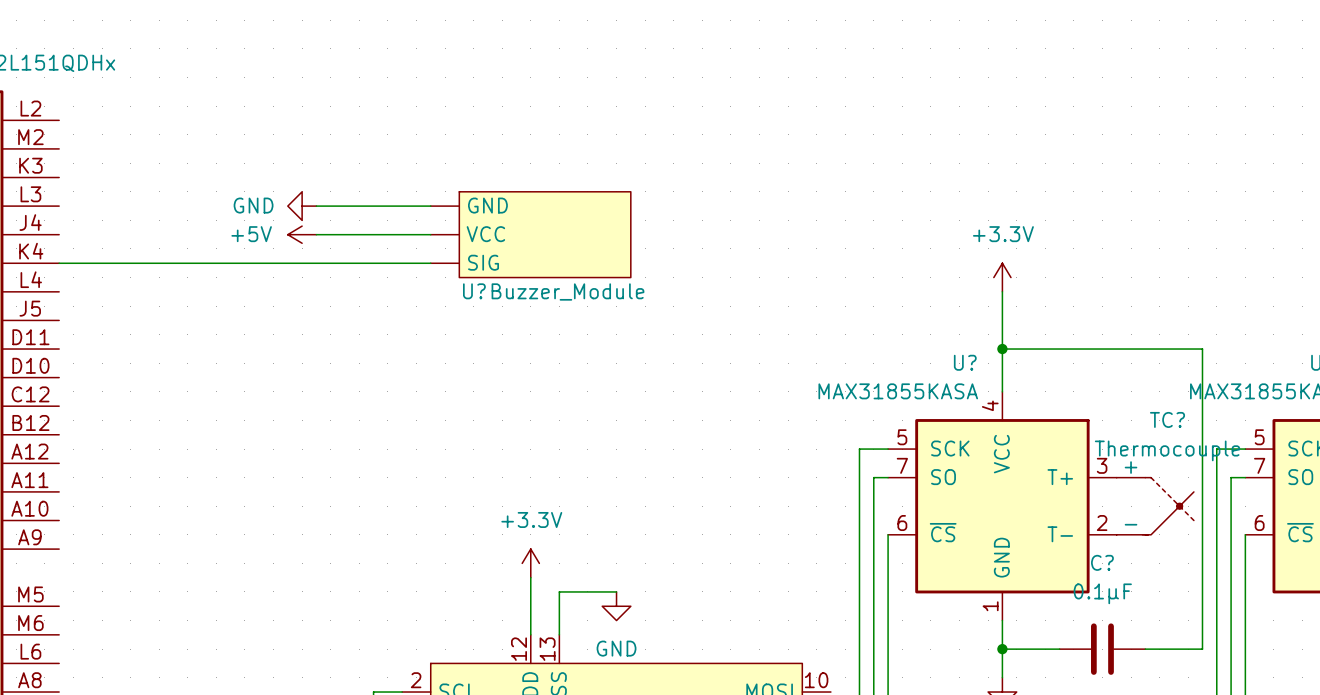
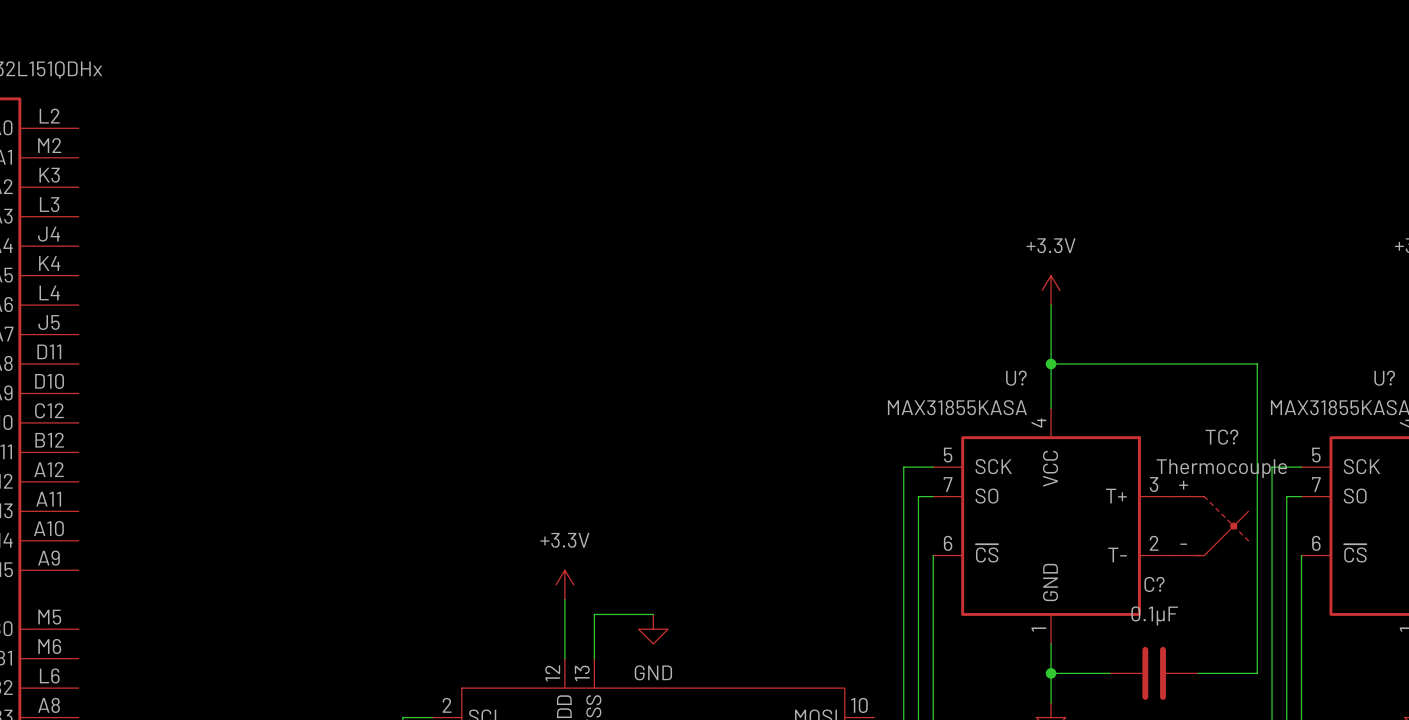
power symbol: GND (302, 206) -> none
wire: (316, 206) (430, 206) -> none
power symbol: +5V (302, 234) -> none
wire: (316, 234) (430, 234) -> none
U?: Buzzer_Module (530, 234) -> none
wire: (59, 263) (430, 263) -> none

